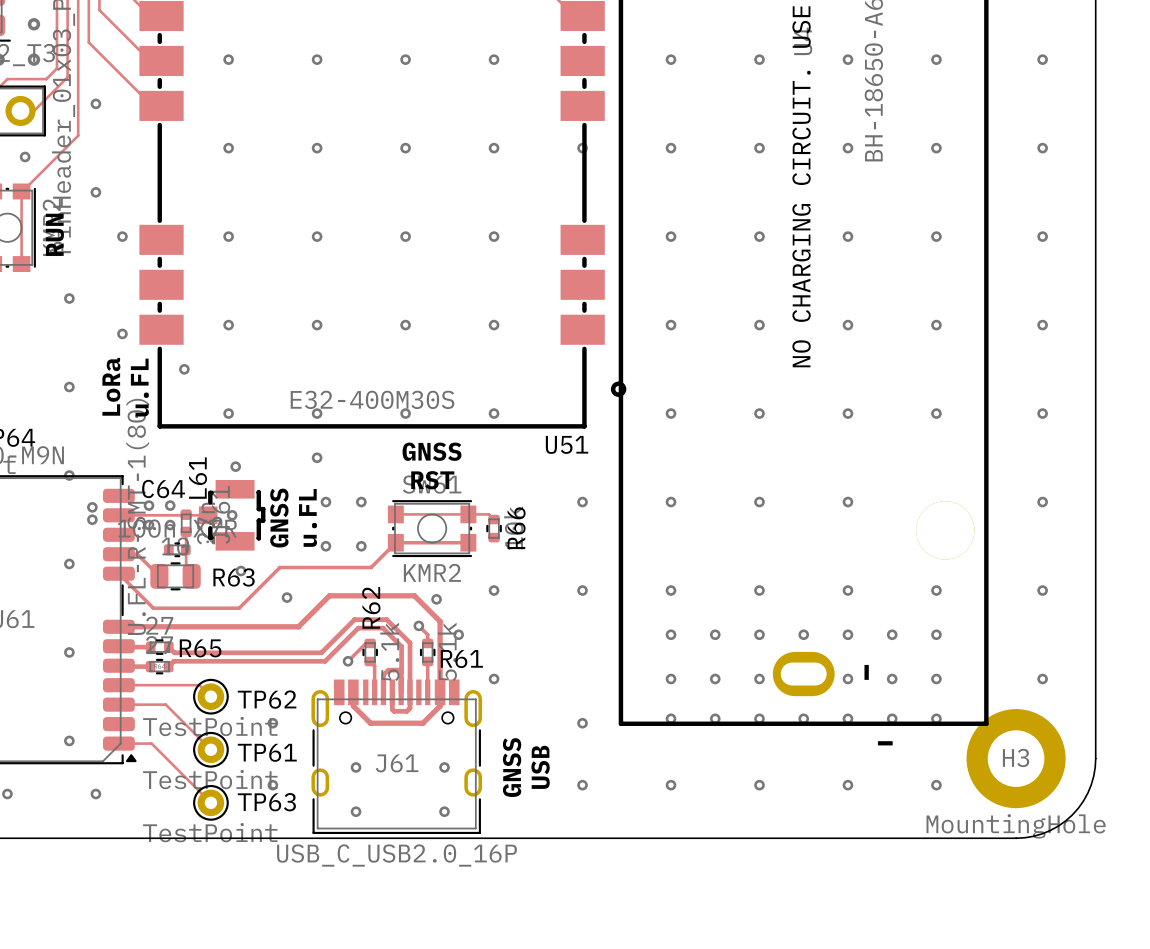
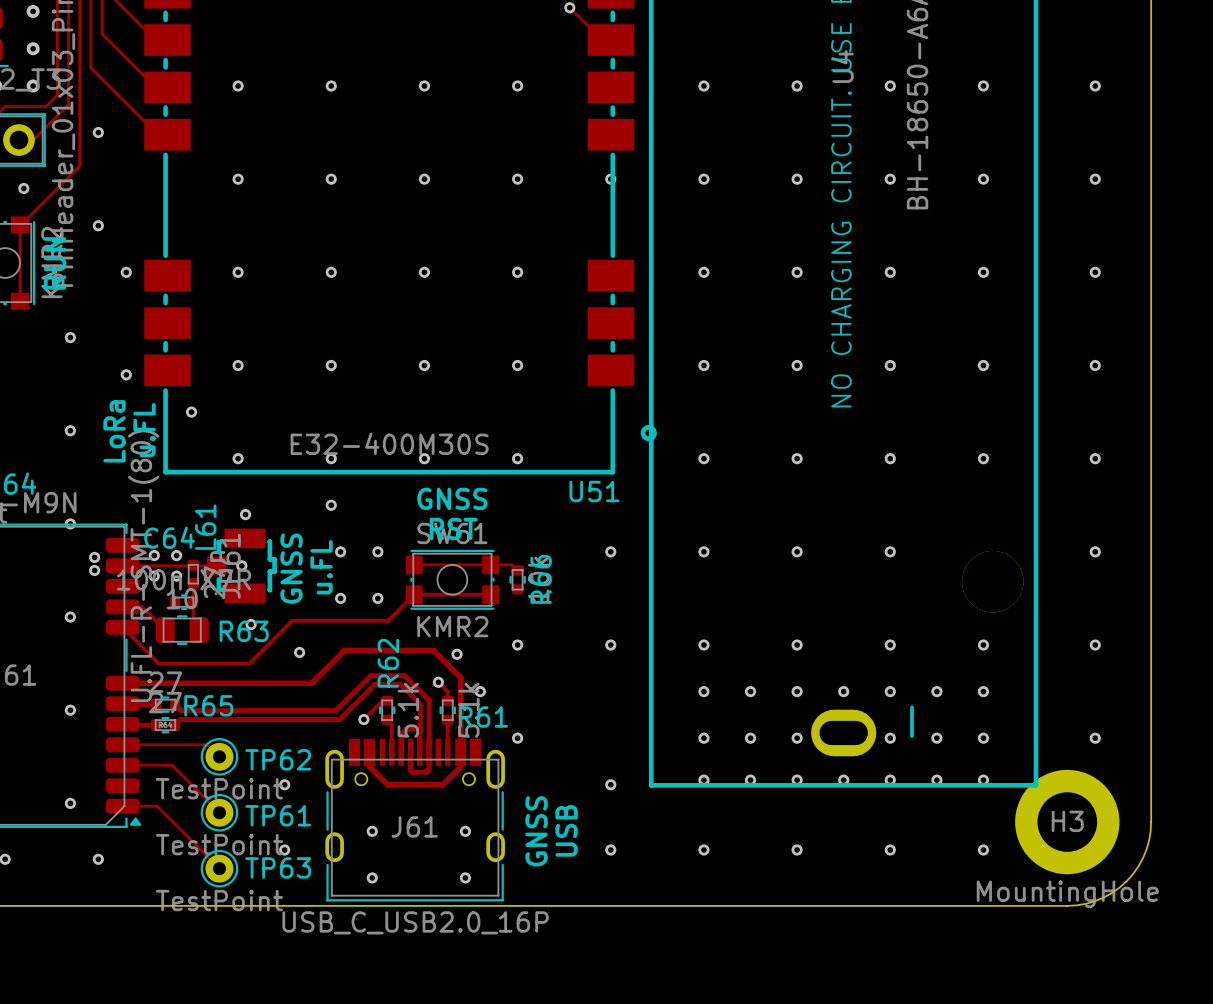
text: - (885, 743) -> none

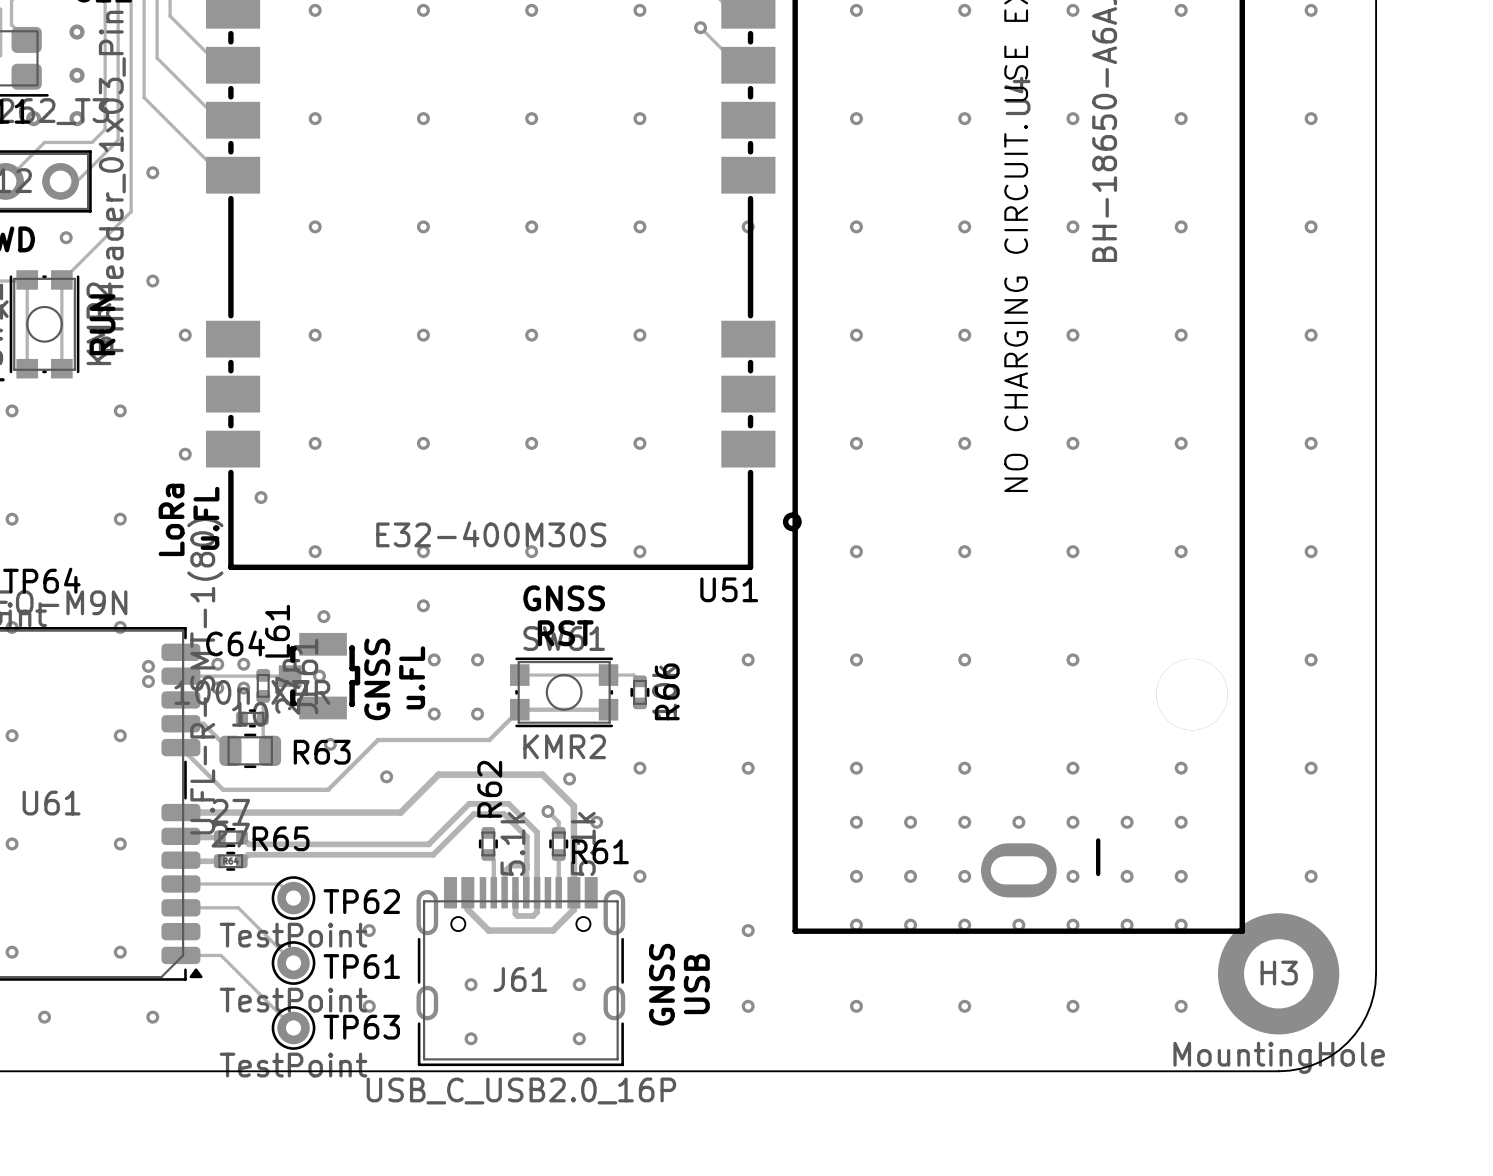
track: (387, 700) (382, 700) (363, 719) -> none
via: (363, 719) -> none

